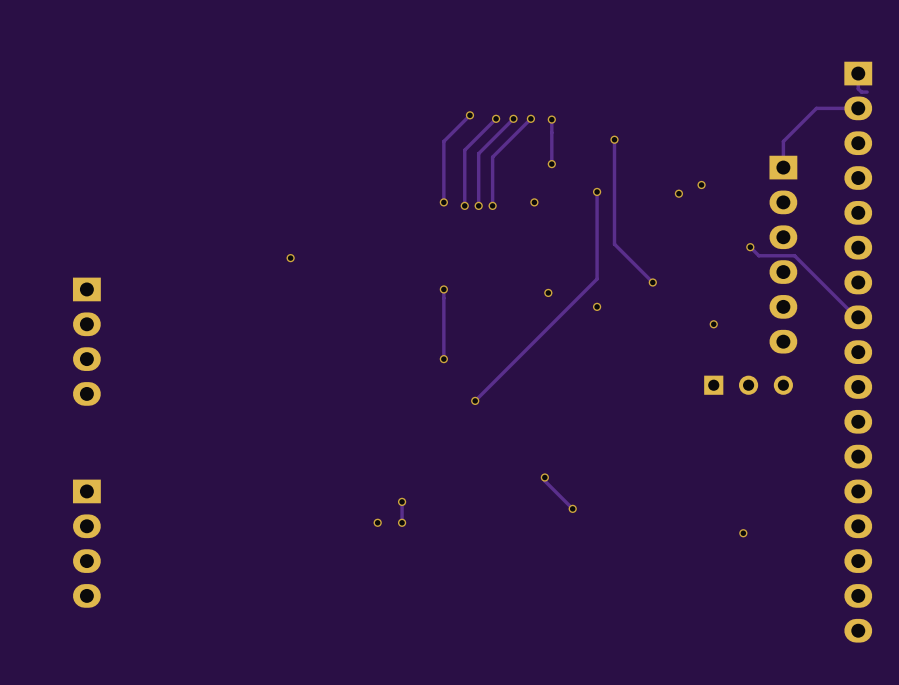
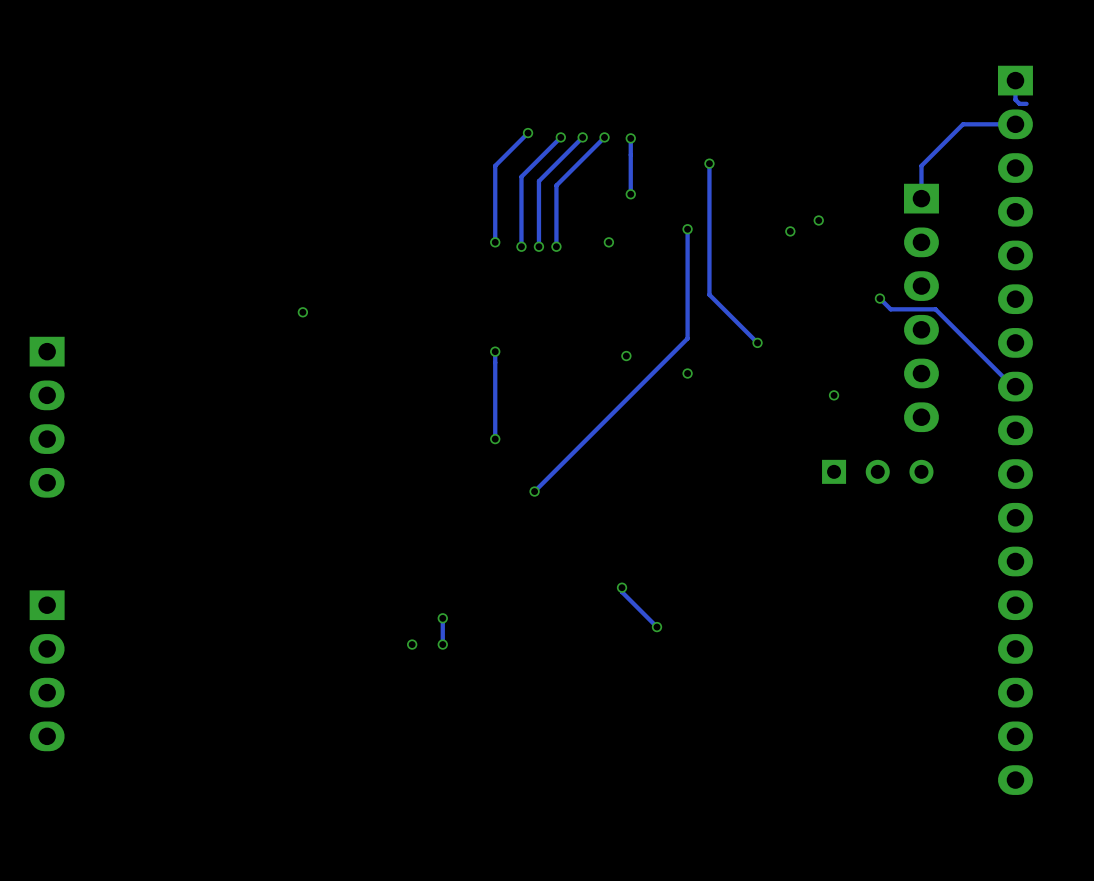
via: (743, 533) -> none

